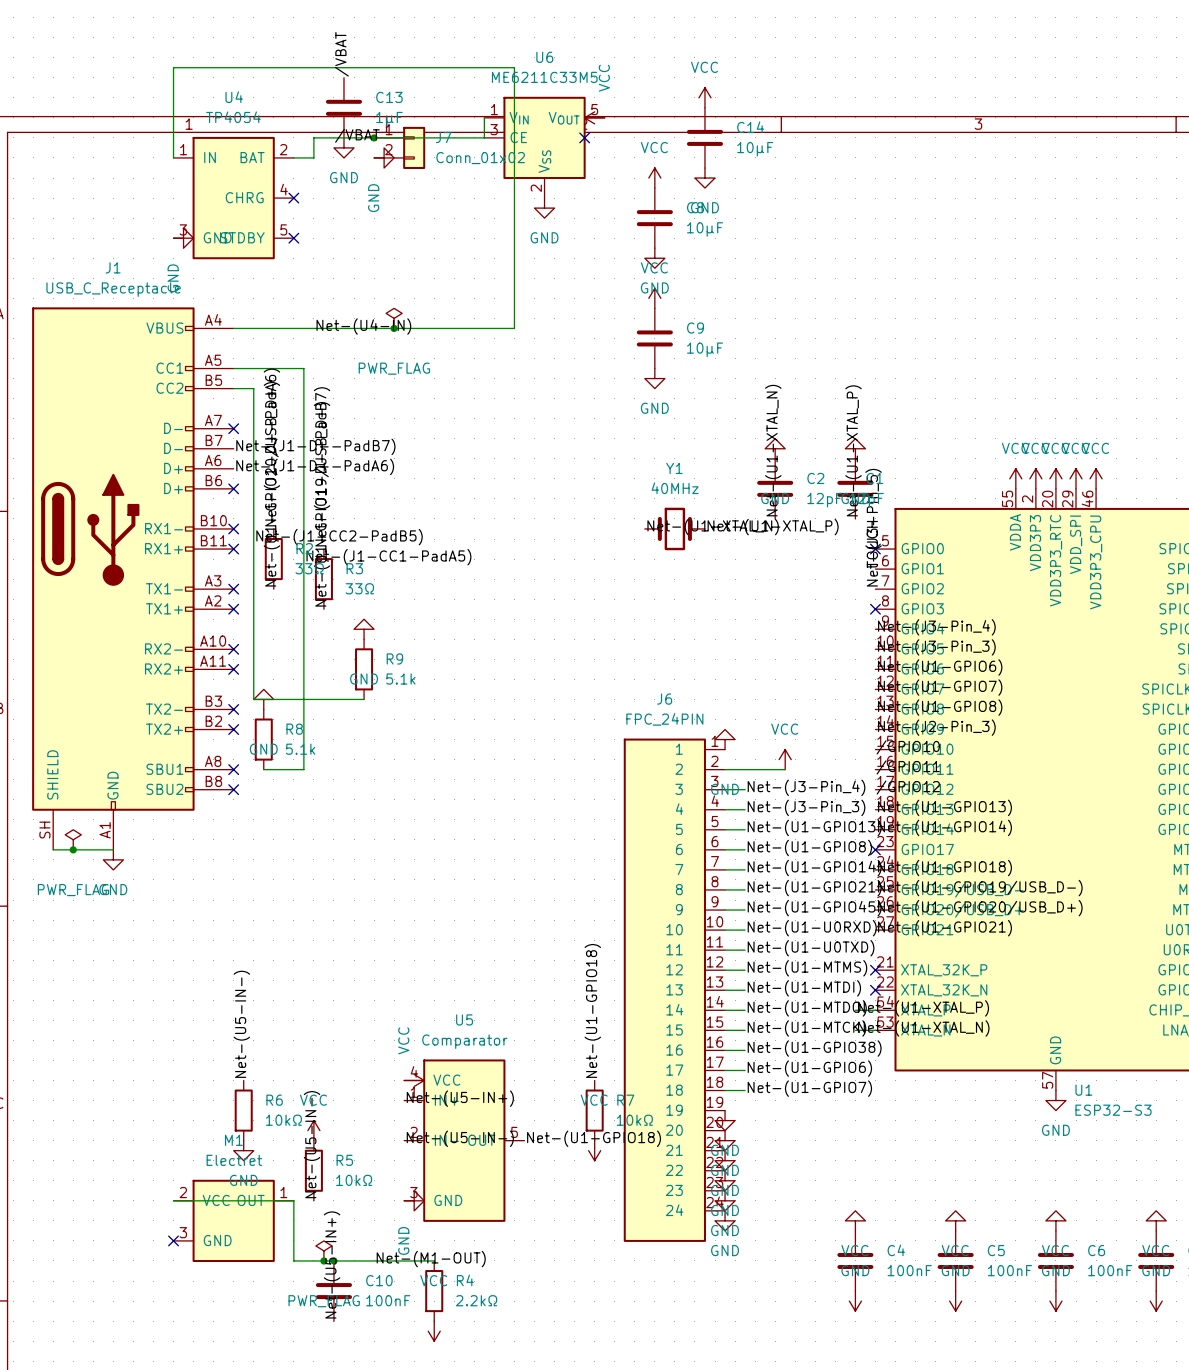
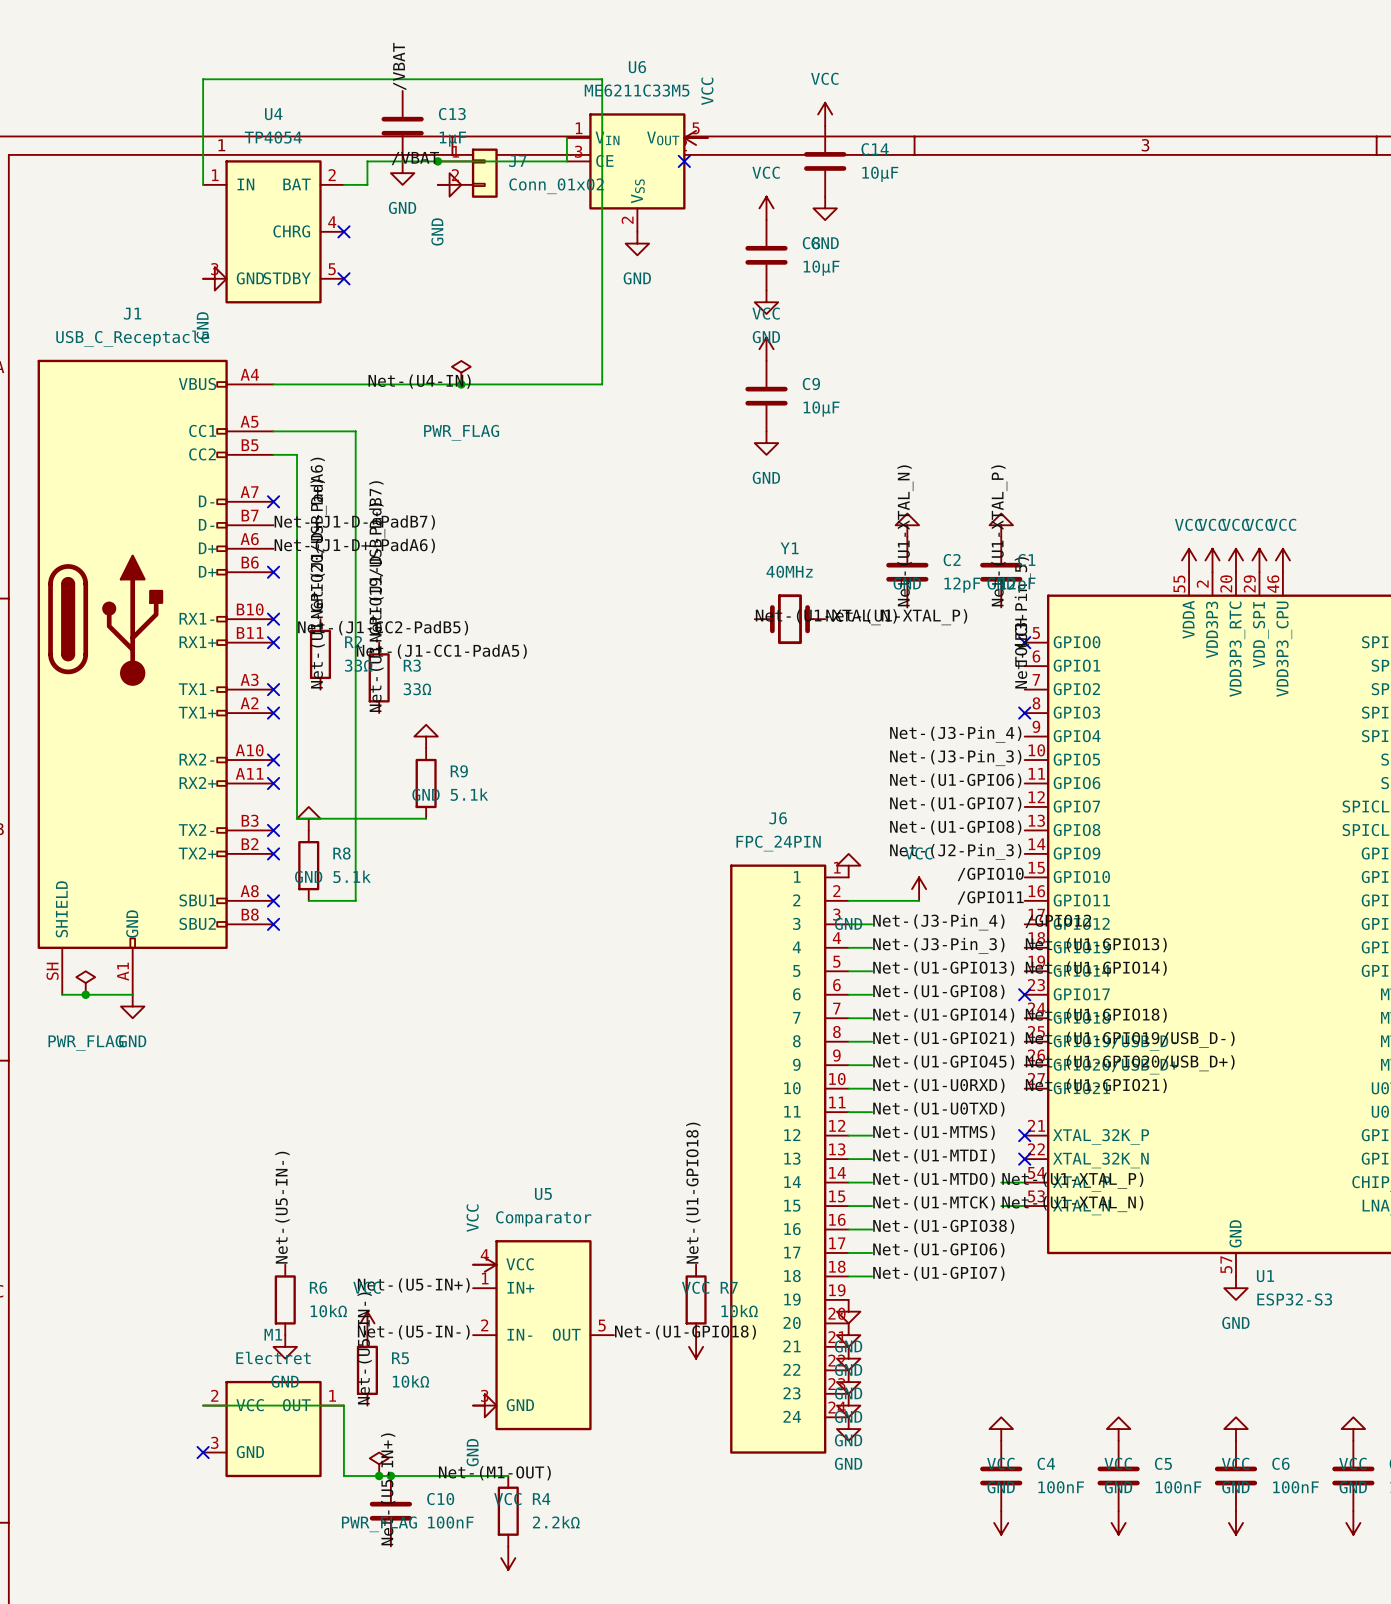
label position: Net-(J3-Pin_4) (936, 627) -> Net-(J3-Pin_4) (955, 734)
label position: Net-(J3-Pin_3) (936, 647) -> Net-(J3-Pin_3) (955, 758)
label position: Net-(U1-GPIO6) (940, 667) -> Net-(U1-GPIO6) (955, 780)
label position: Net-(U1-GPIO7) (940, 687) -> Net-(U1-GPIO7) (955, 804)
label position: Net-(U1-GPIO8) (940, 707) -> Net-(U1-GPIO8) (955, 827)
label position: Net-(J2-Pin_3) (936, 727) -> Net-(J2-Pin_3) (955, 851)
label position: /GPIO10 (908, 747) -> /GPIO10 (990, 874)
label position: /GPIO11 (908, 767) -> /GPIO11 (990, 897)
label position: Net-(U5-IN+) (460, 1098) -> Net-(U5-IN+) (413, 1285)
label position: Net-(U5-IN-) (460, 1138) -> Net-(U5-IN-) (413, 1332)

